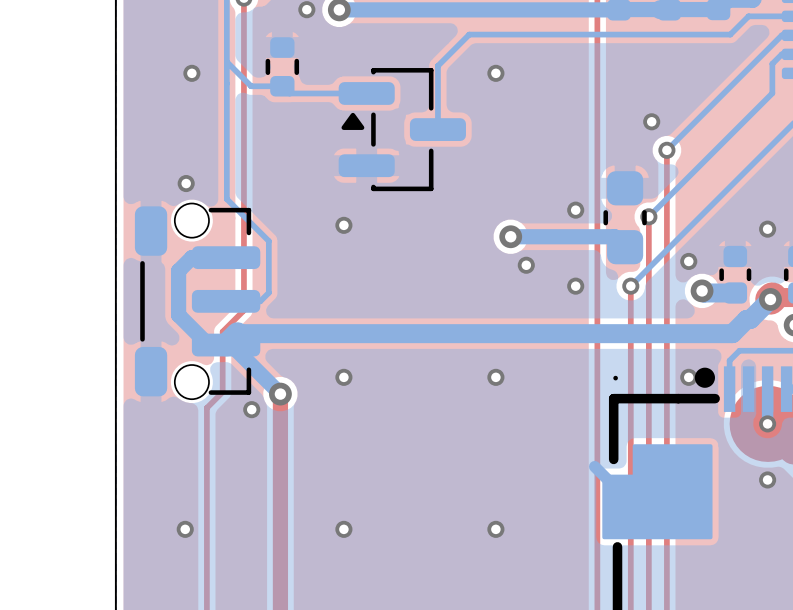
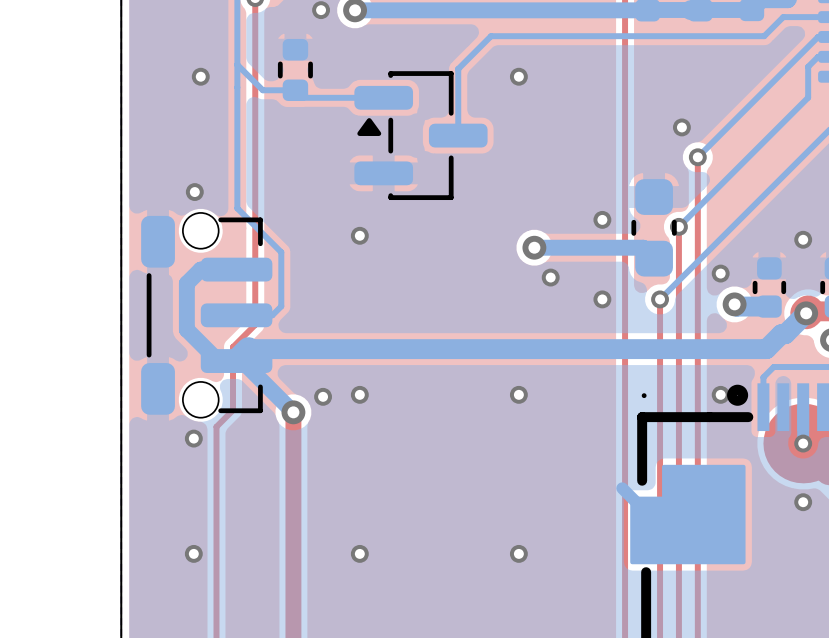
via: none -> (323, 396)
via: (251, 409) -> none
via: none -> (193, 438)

